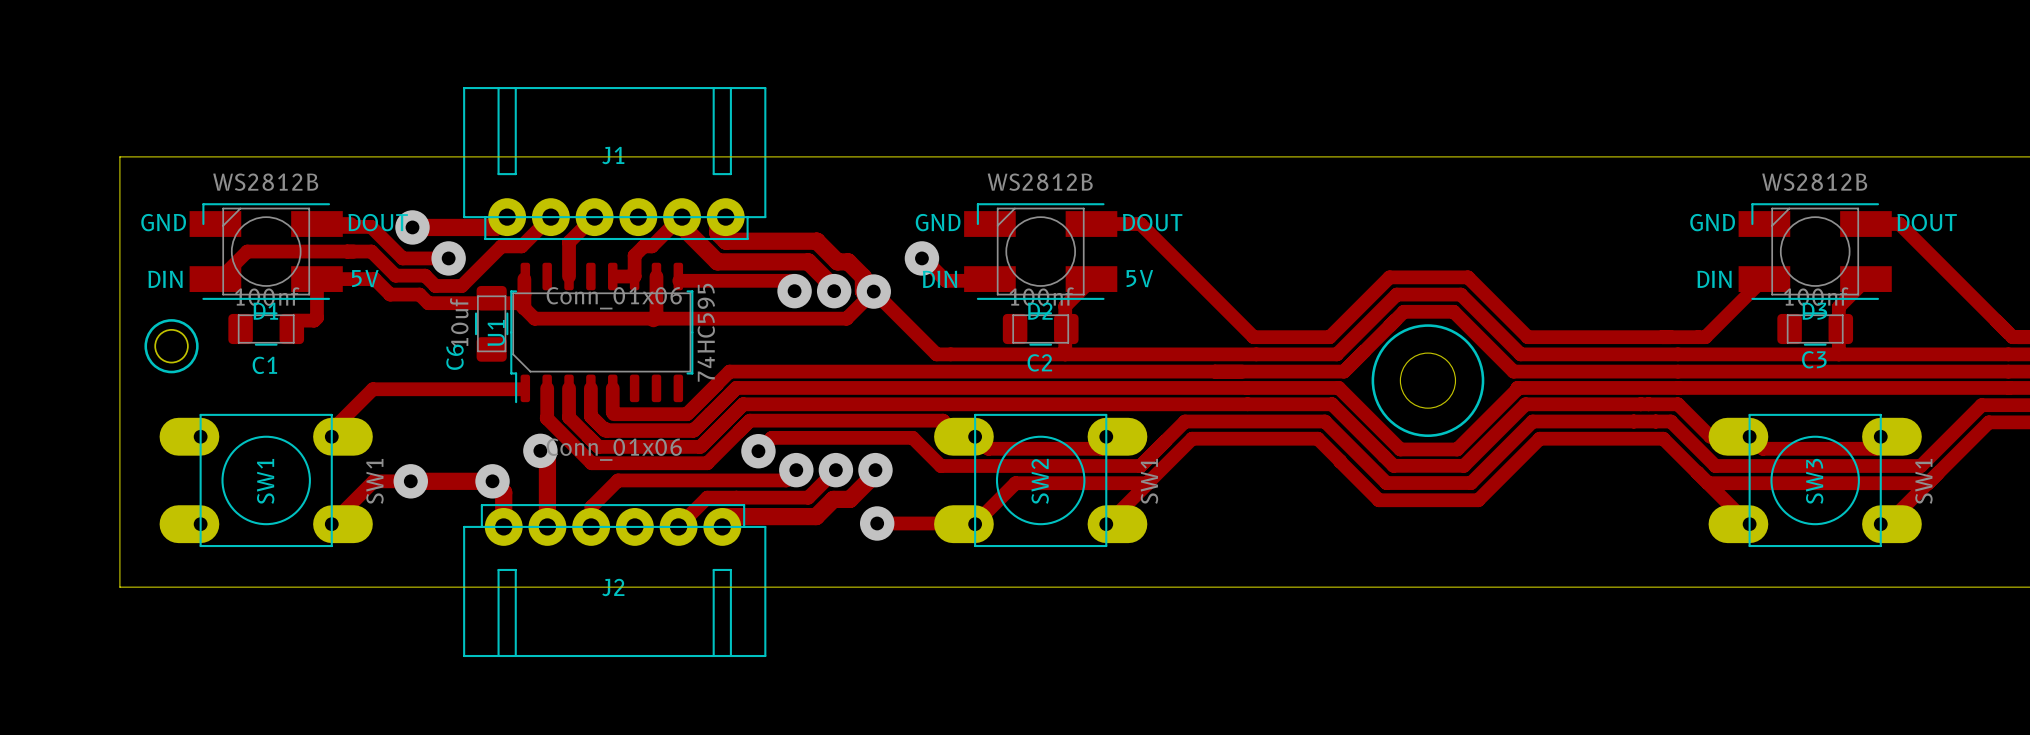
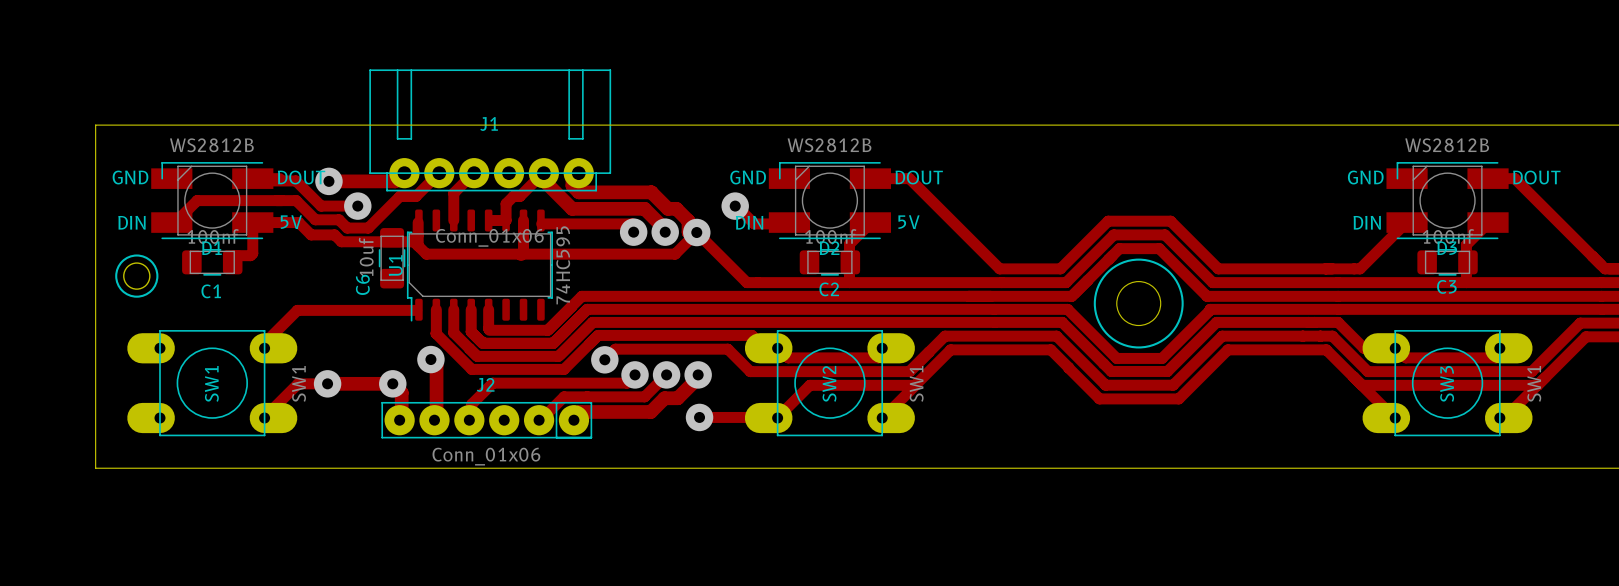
J2 value position: Conn_01x06 (614, 449) -> Conn_01x06 (486, 456)
J2 footprint: [463, 504, 767, 658] -> [381, 401, 593, 439]
J2 name position: J2 (613, 587) -> J2 (485, 384)

